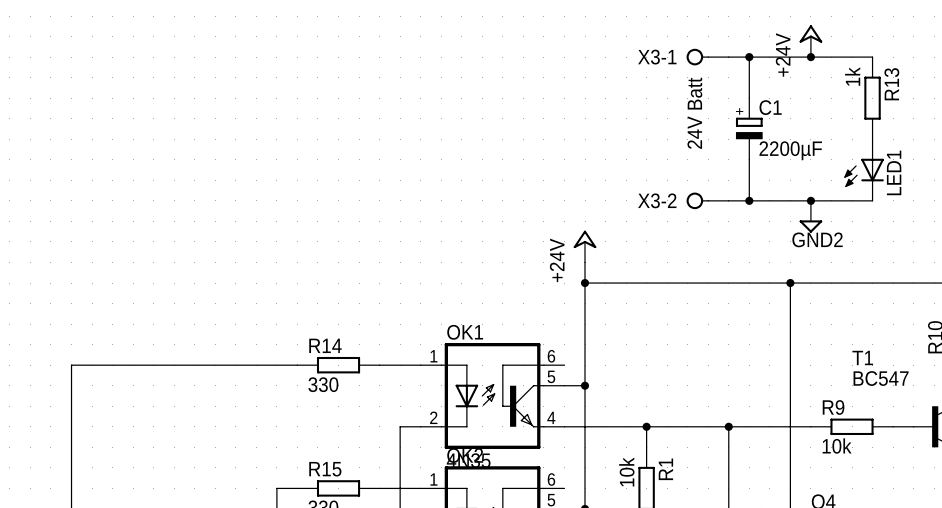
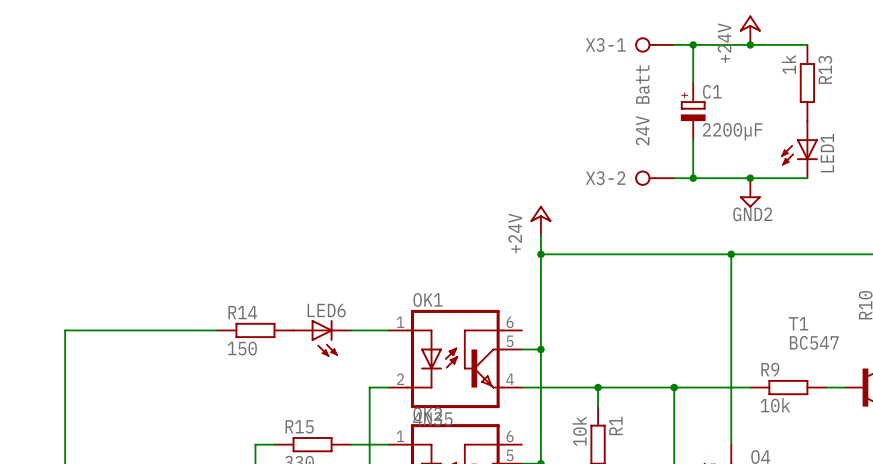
wire: (235, 365) (297, 365) -> none
R14 position: (338, 365) -> (255, 330)
LED6: none -> (322, 338)
R14 value: 330 (323, 384) -> 150 (242, 348)

